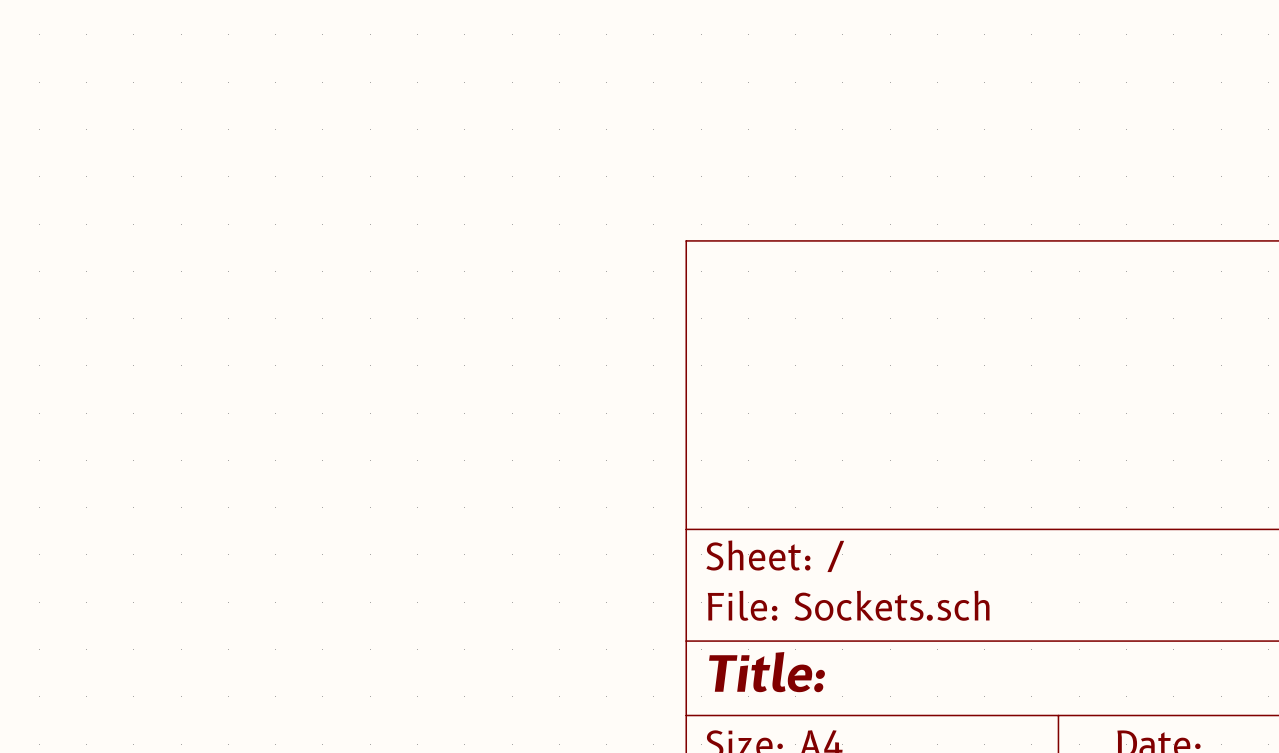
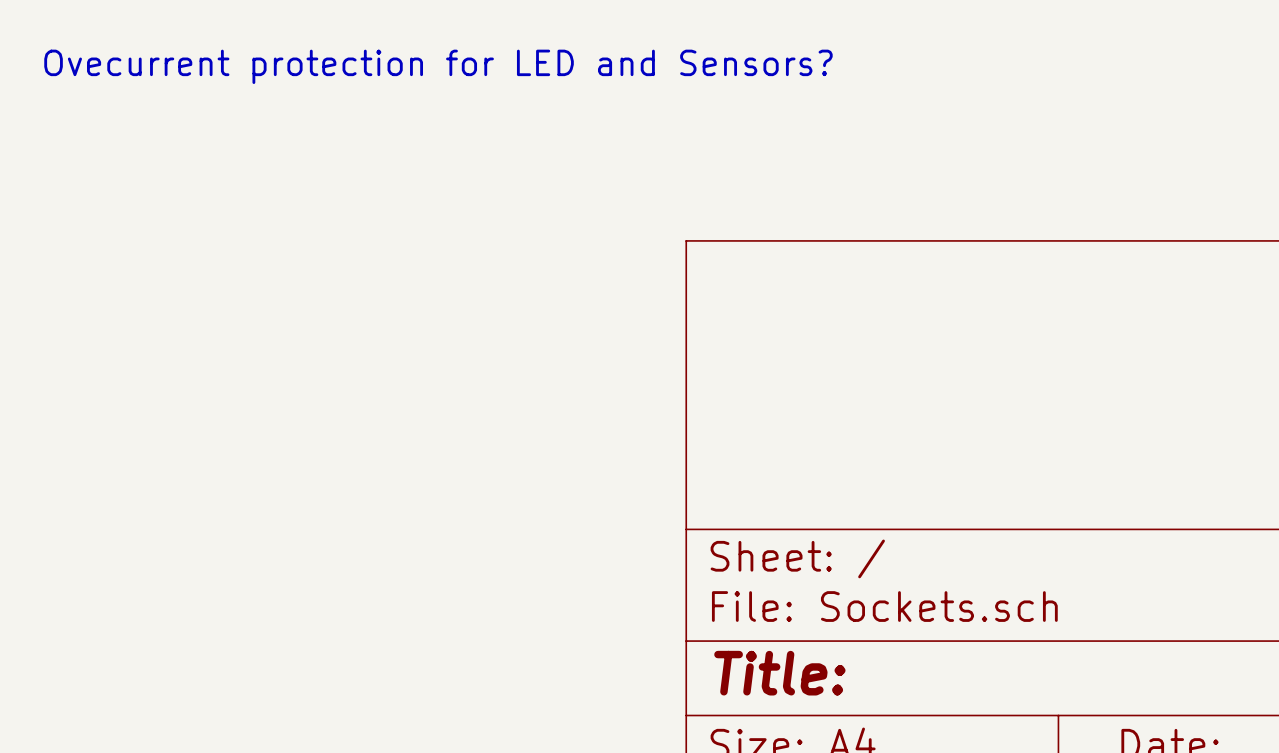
text: none -> Ovecurrent protection for LED and Sensors? (438, 66)

